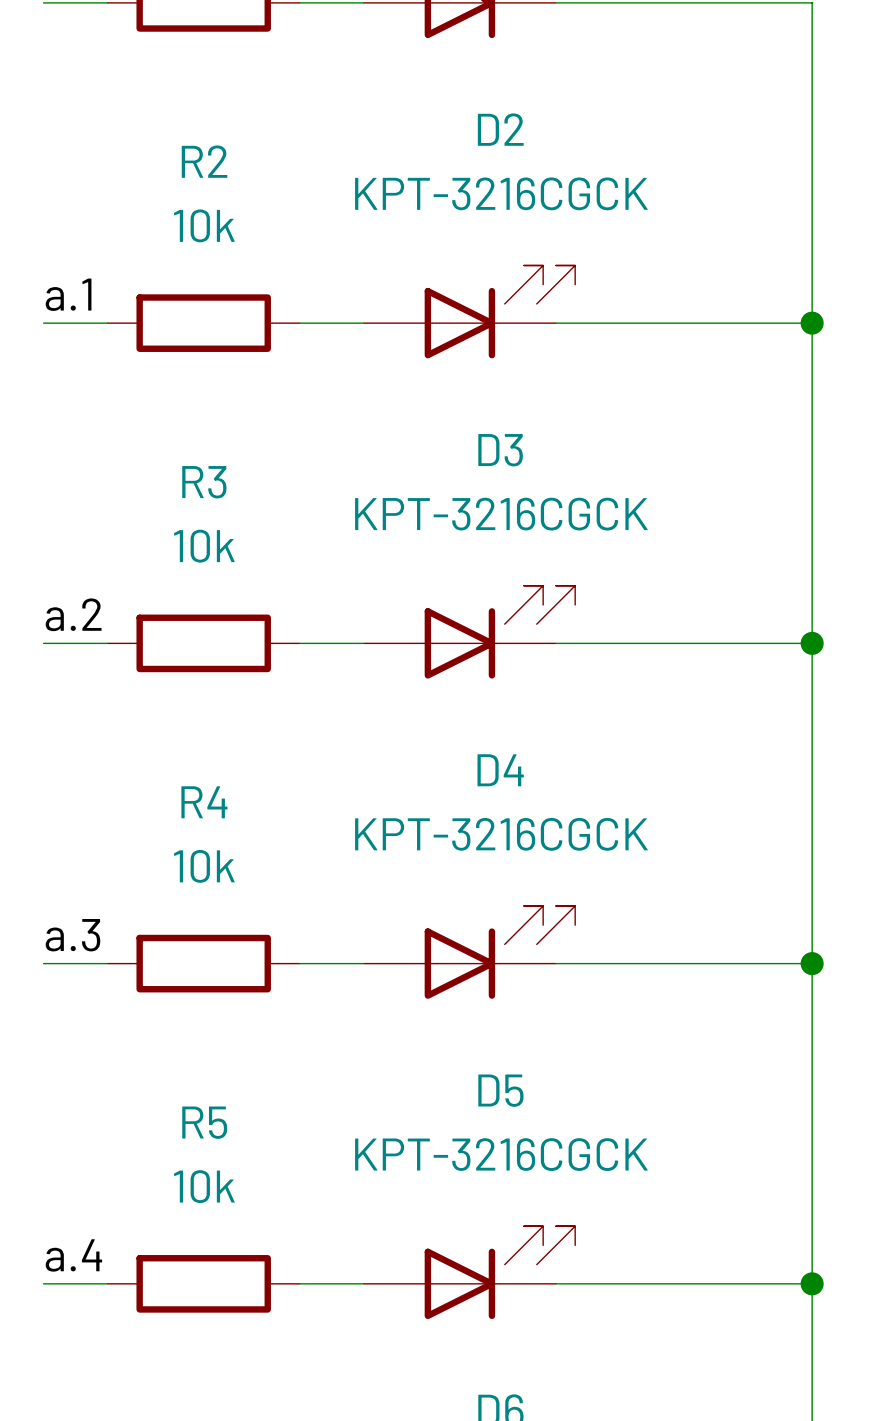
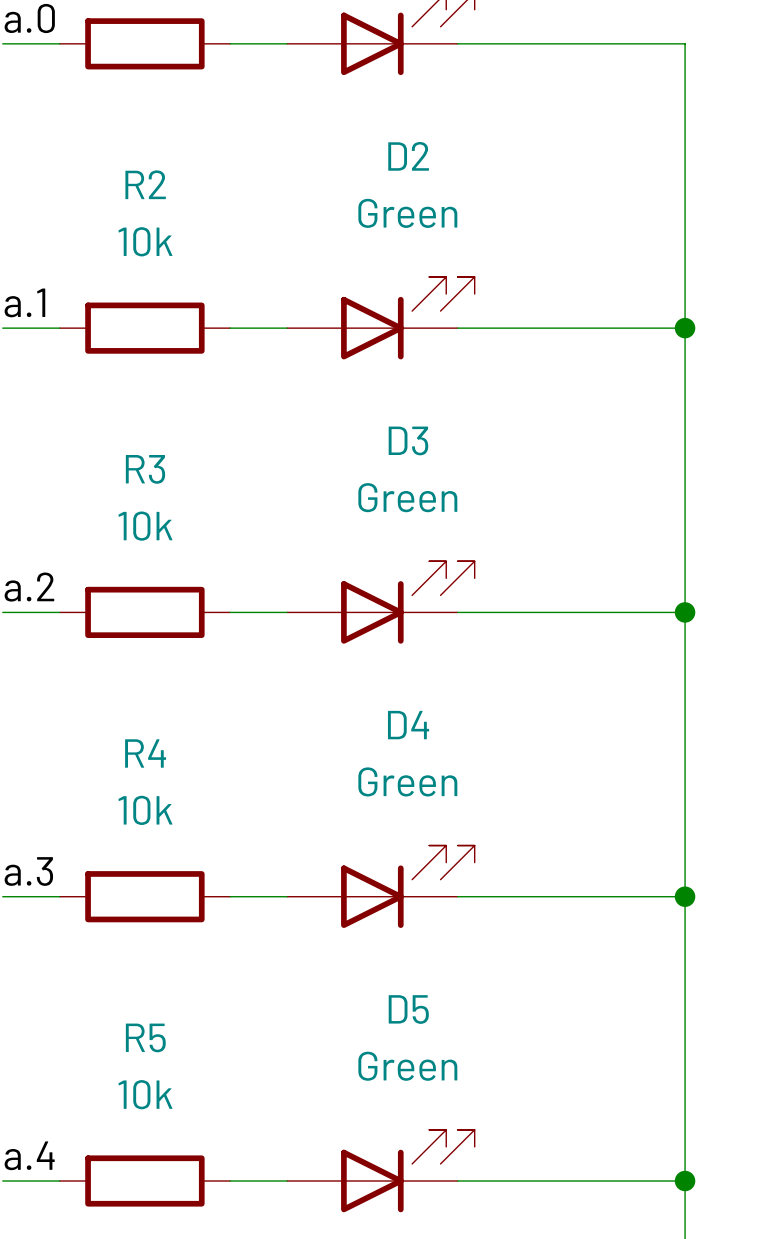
D2 value: KPT-3216CGCK (501, 193) -> Green (407, 213)
D3 value: KPT-3216CGCK (501, 514) -> Green (407, 497)
D4 value: KPT-3216CGCK (501, 834) -> Green (407, 781)
D5 value: KPT-3216CGCK (501, 1154) -> Green (407, 1066)

